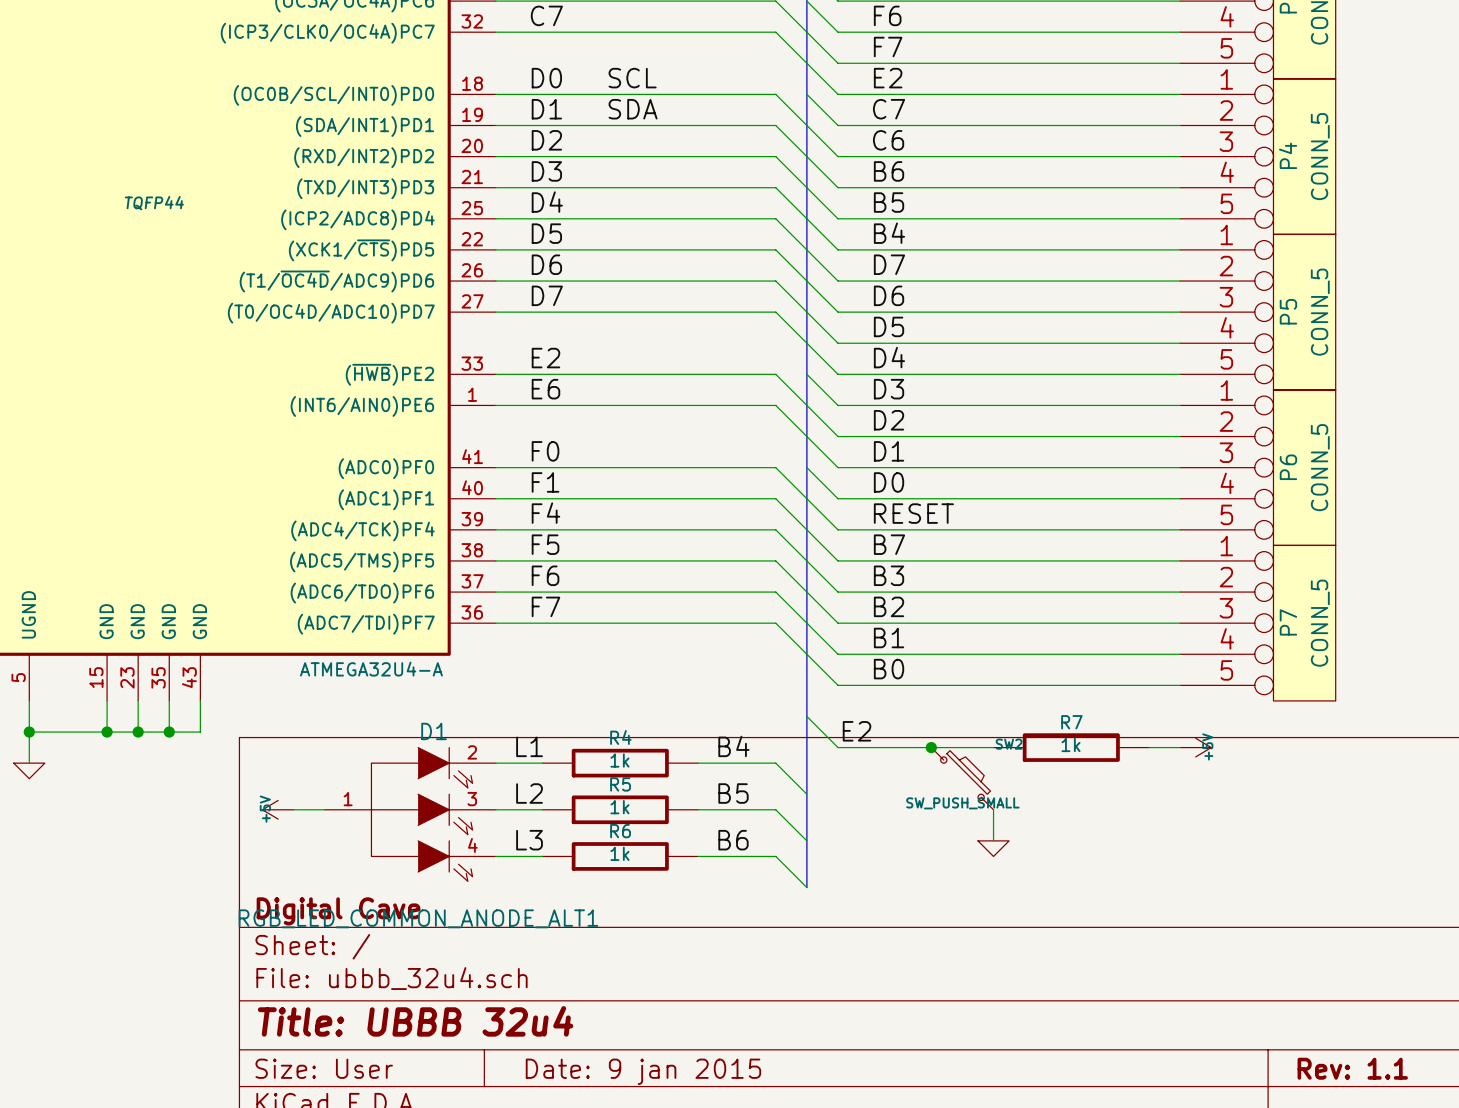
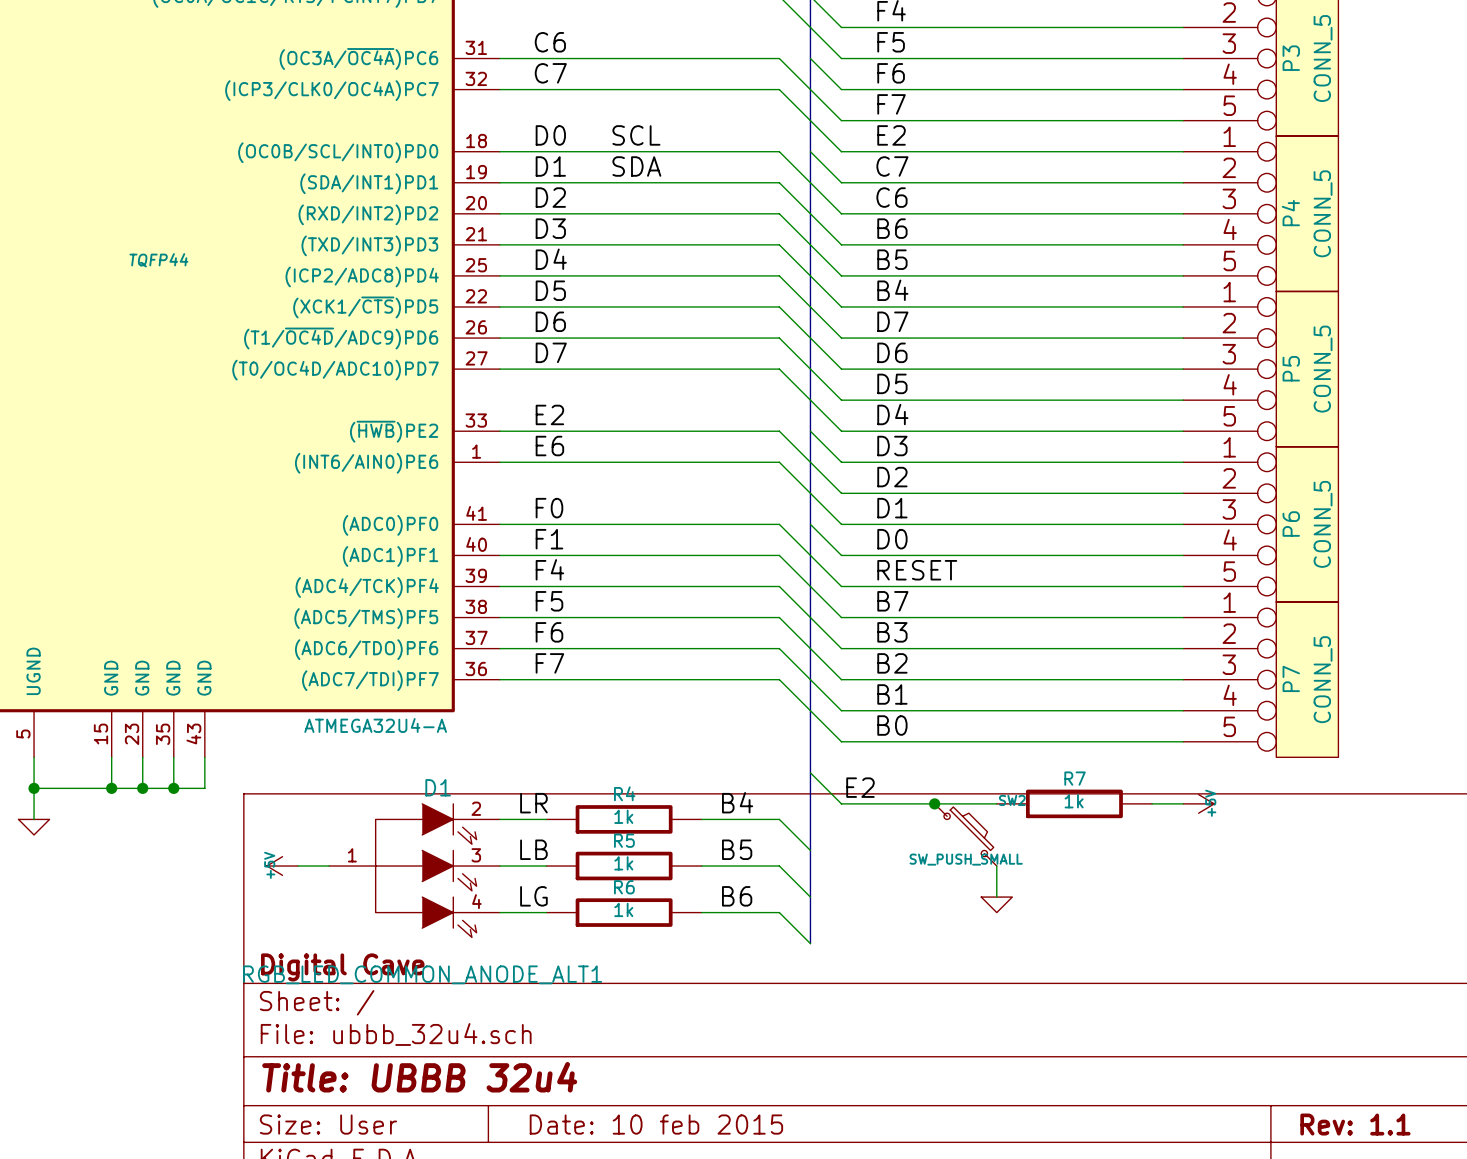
label: L1 (529, 746) -> LR (533, 803)
label: L2 (529, 793) -> LB (533, 849)
label: L3 (529, 840) -> LG (533, 896)
title block: Date: 9 jan 2015 (643, 1071) -> Date: 10 feb 2015 (656, 1124)

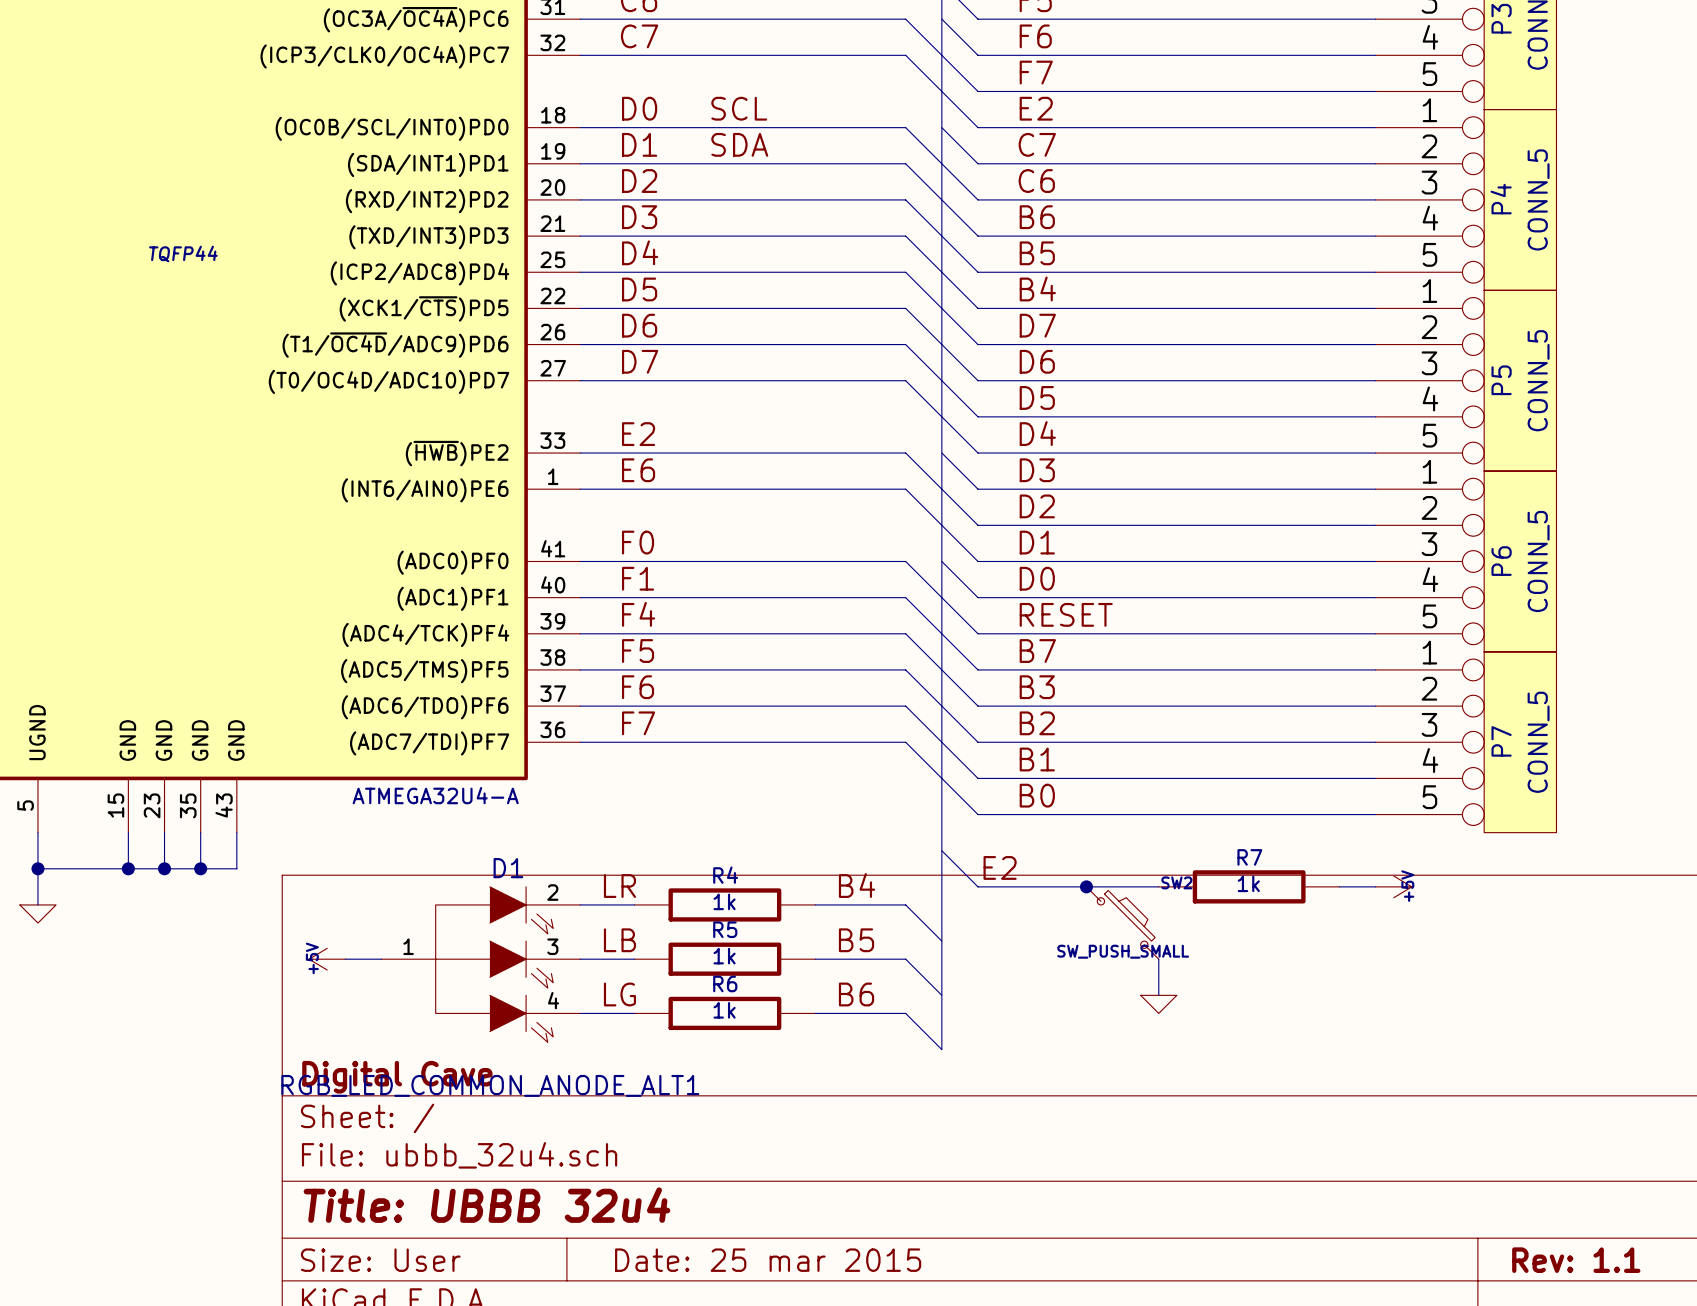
title block: Date: 10 feb 2015 (656, 1124) -> Date: 25 mar 2015 (768, 1260)

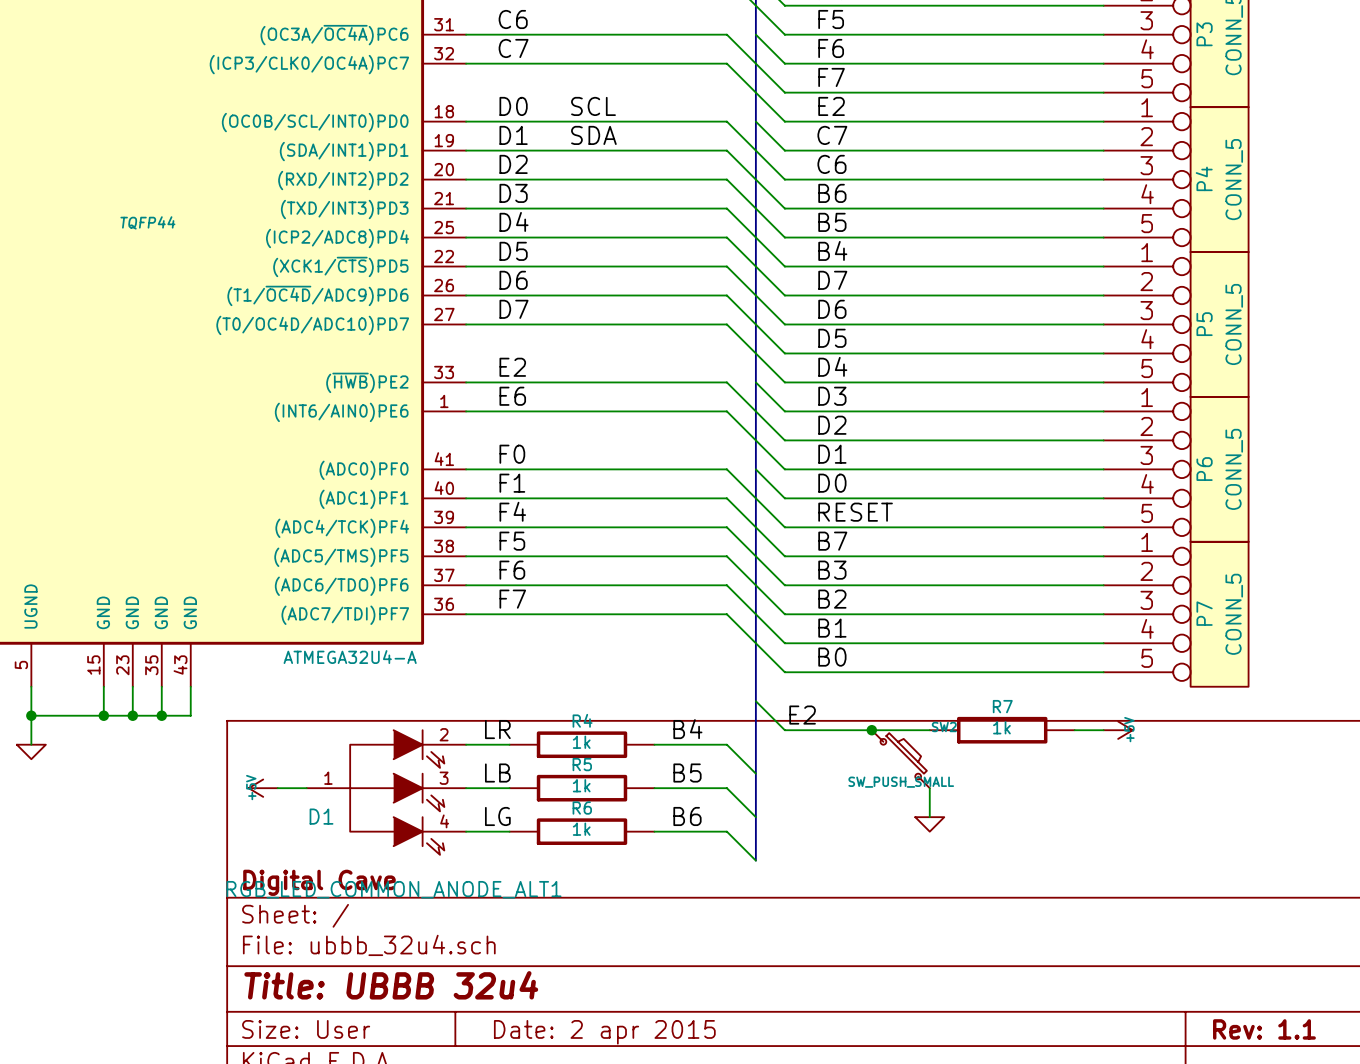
D1 name position: D1 (508, 868) -> D1 (321, 816)
title block: Date: 25 mar 2015 (768, 1260) -> Date: 2 apr 2015 (604, 1032)

